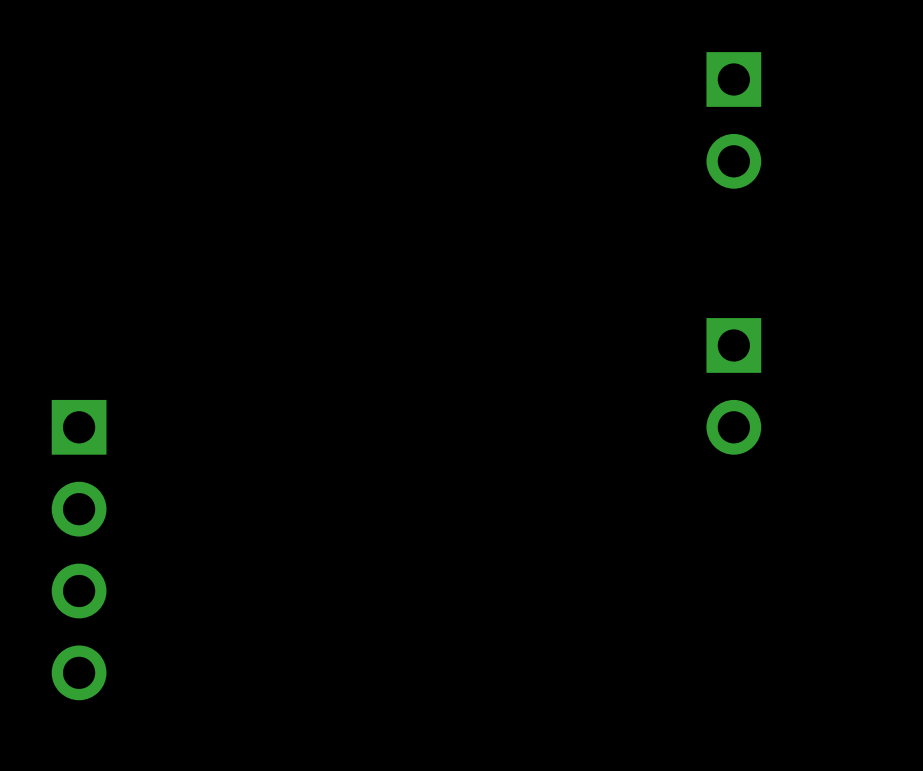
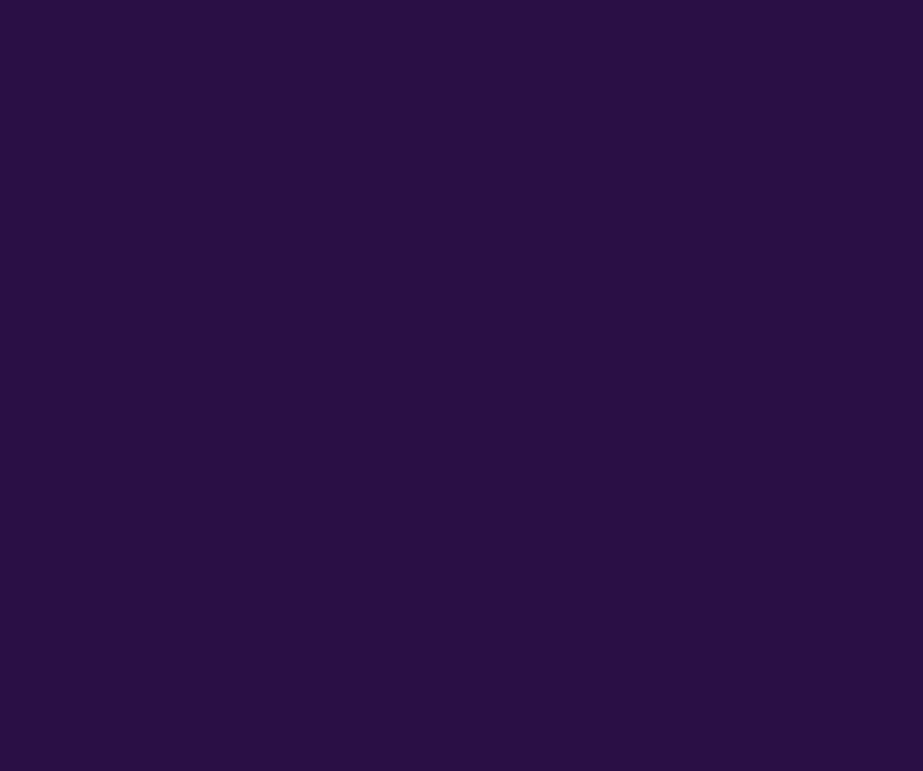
part: (733, 120) -> none
part: (733, 386) -> none
part: (79, 550) -> none

